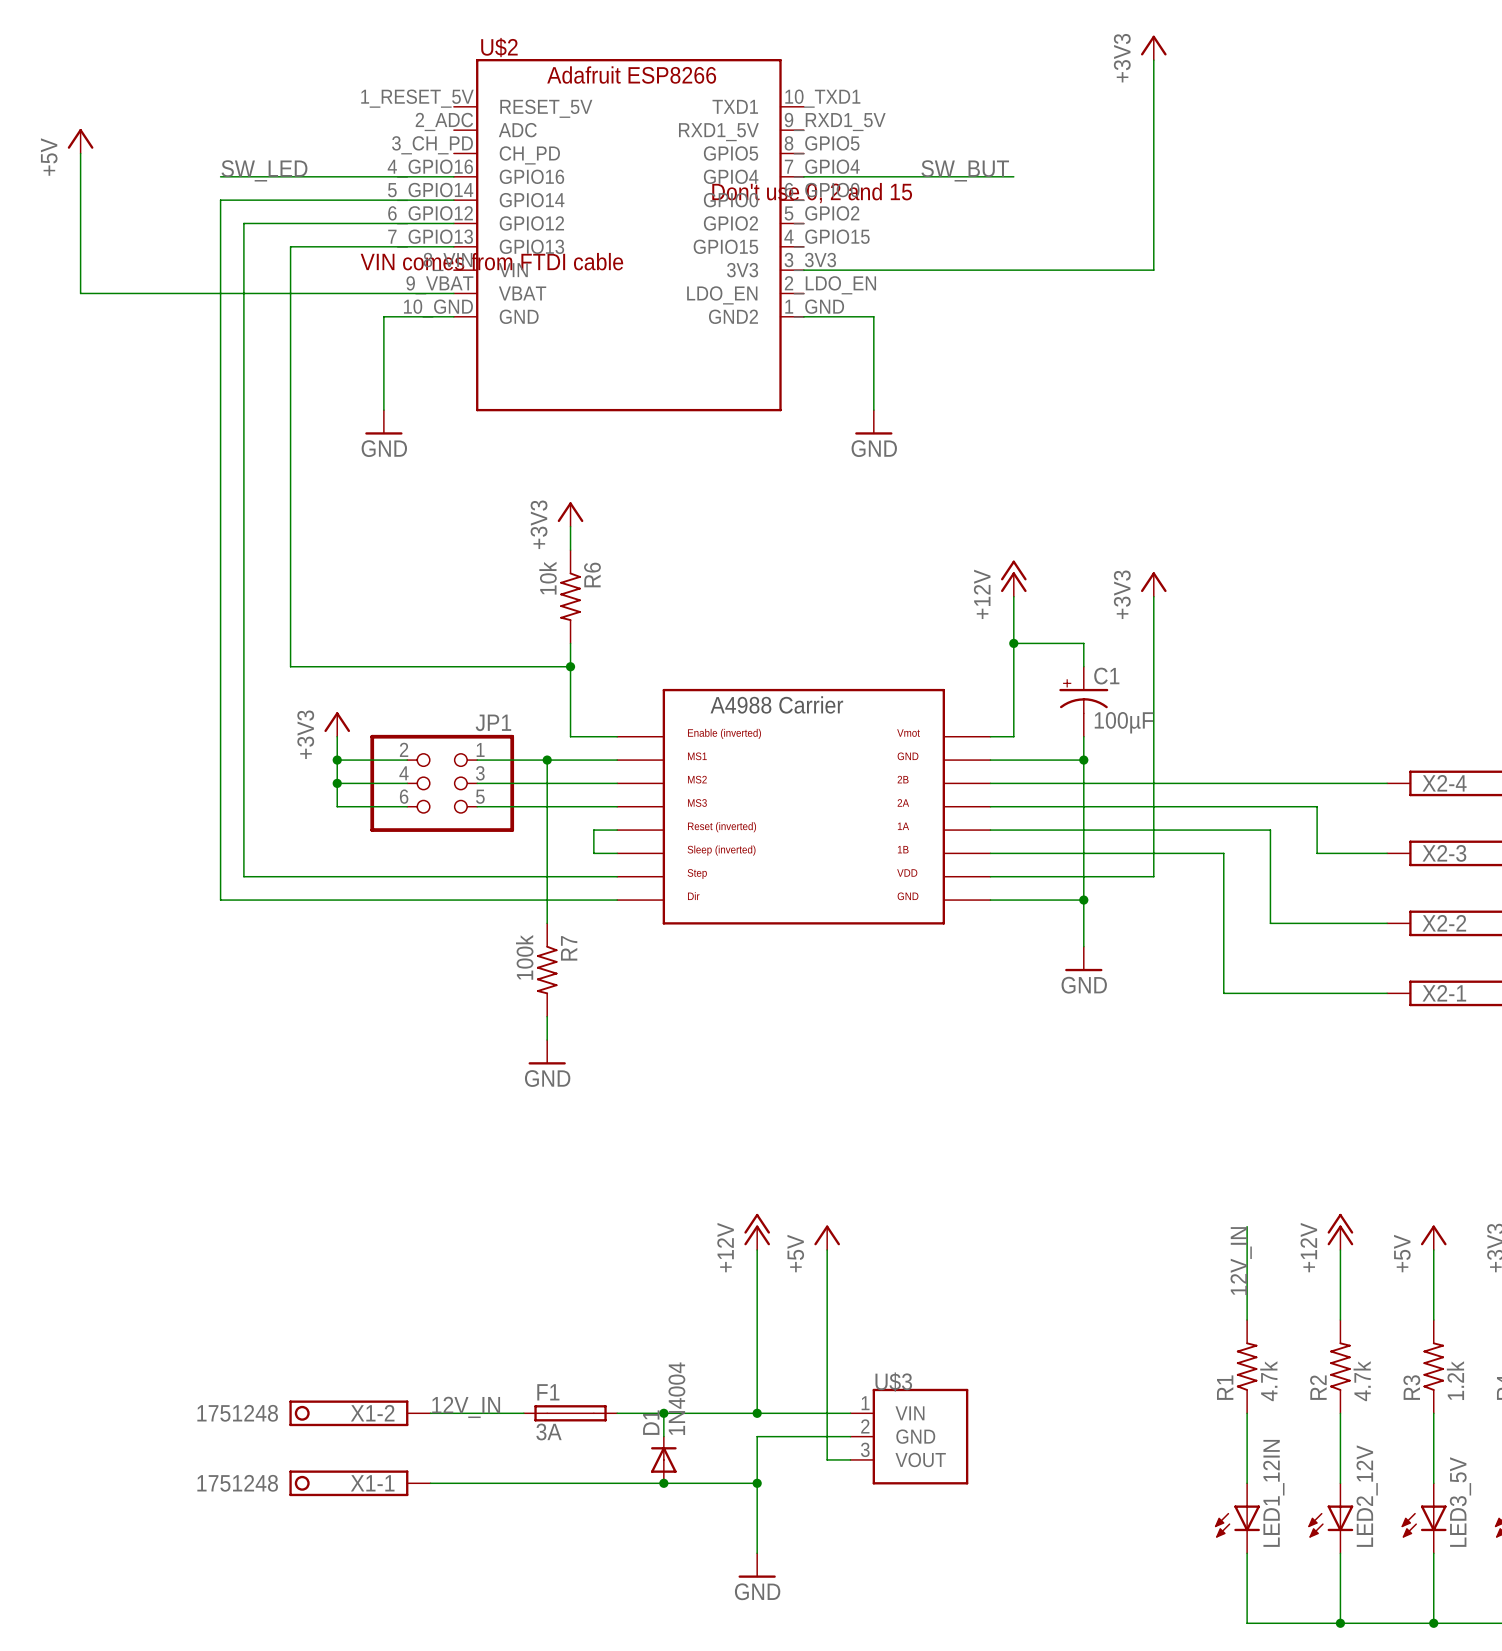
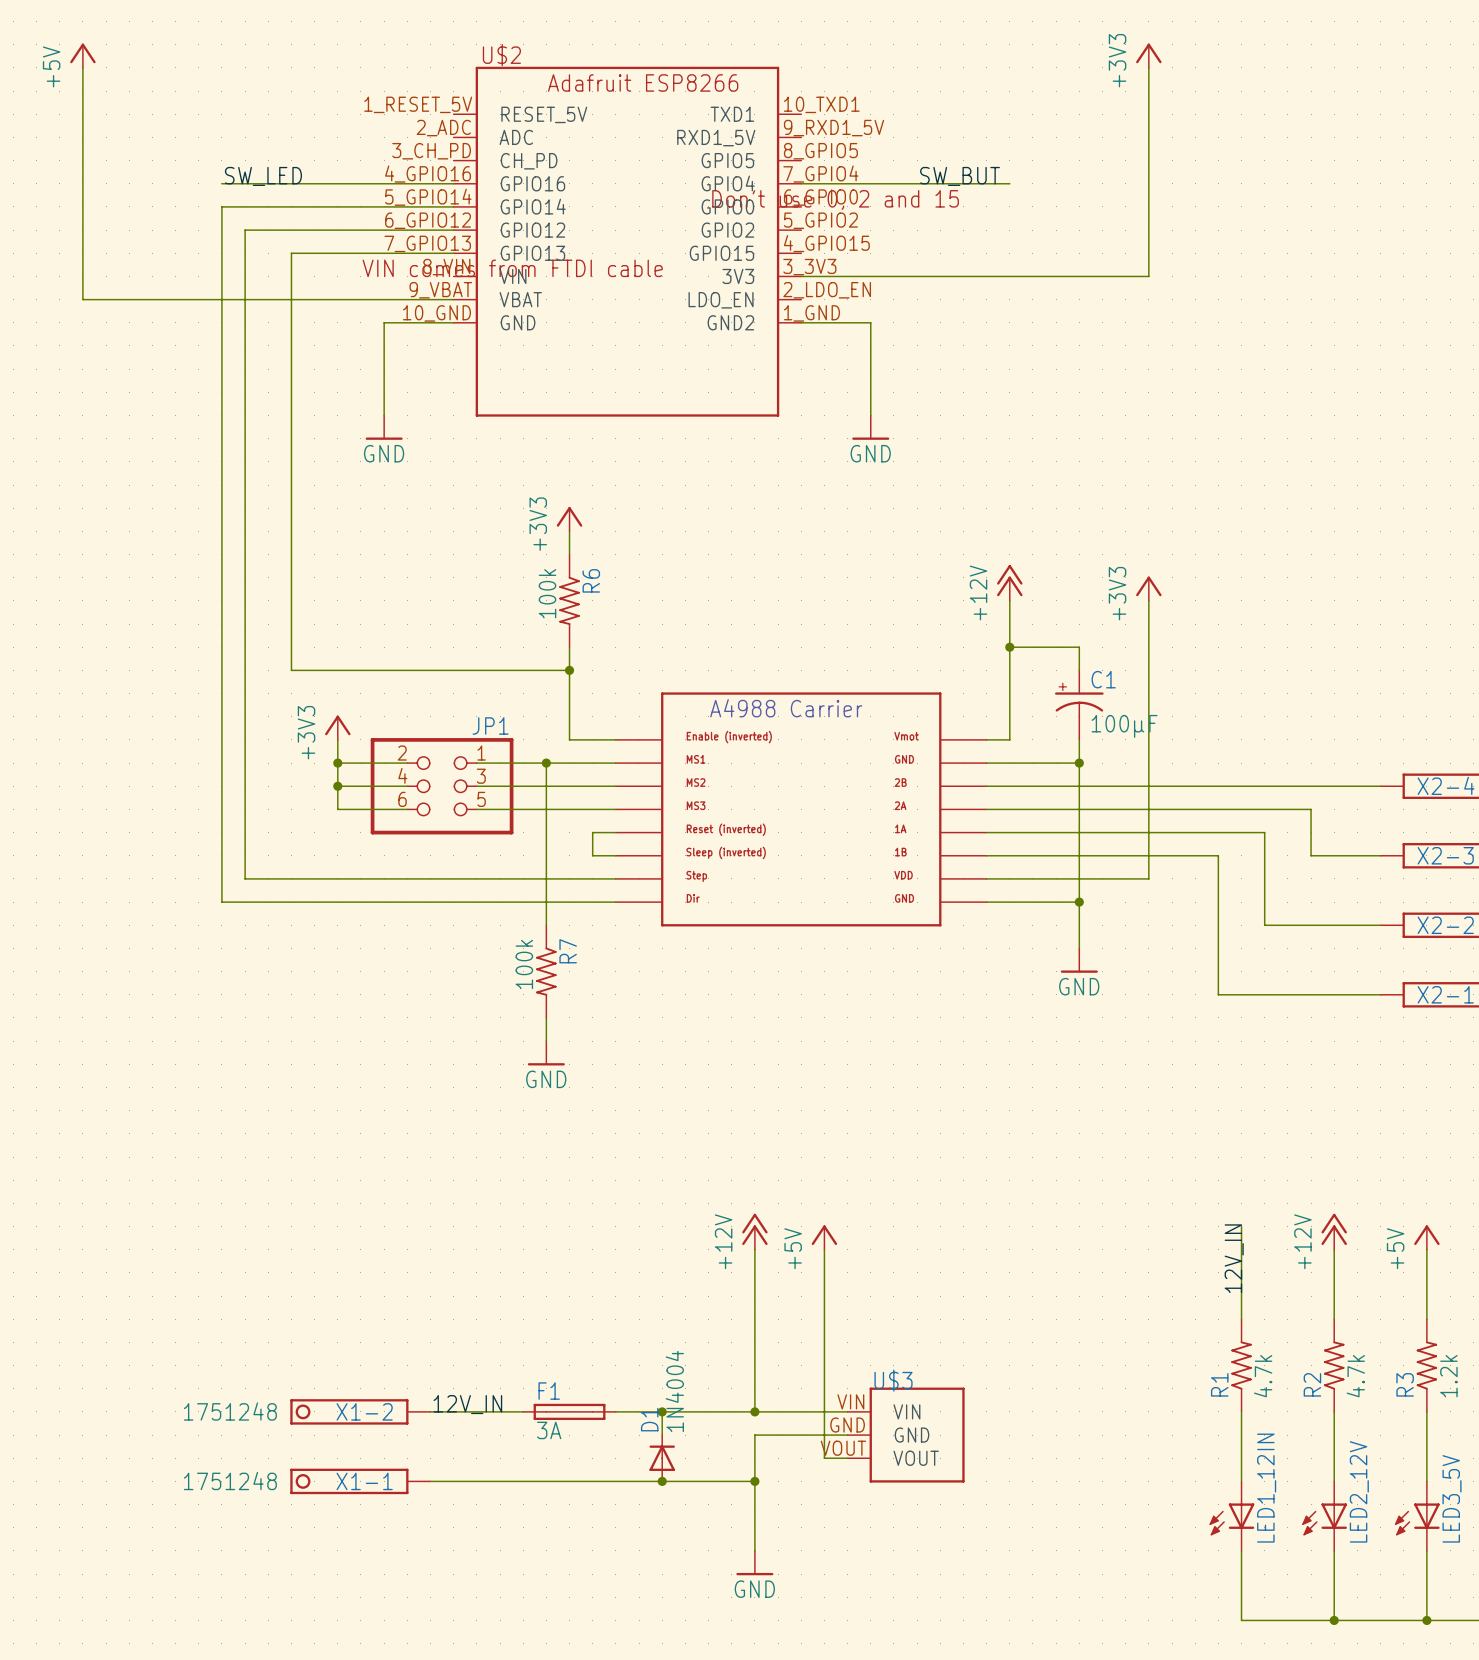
wire: none -> (82, 67) (82, 160)
power symbol position: +5V (80, 141) -> +5V (82, 55)
R6 value: 10k (548, 578) -> 100k (547, 593)
U$3 pin number: 1 (865, 1403) -> VIN (850, 1401)
U$3 pin number: 2 (865, 1426) -> GND (847, 1425)
U$3 pin number: 3 (865, 1449) -> VOUT (843, 1448)

